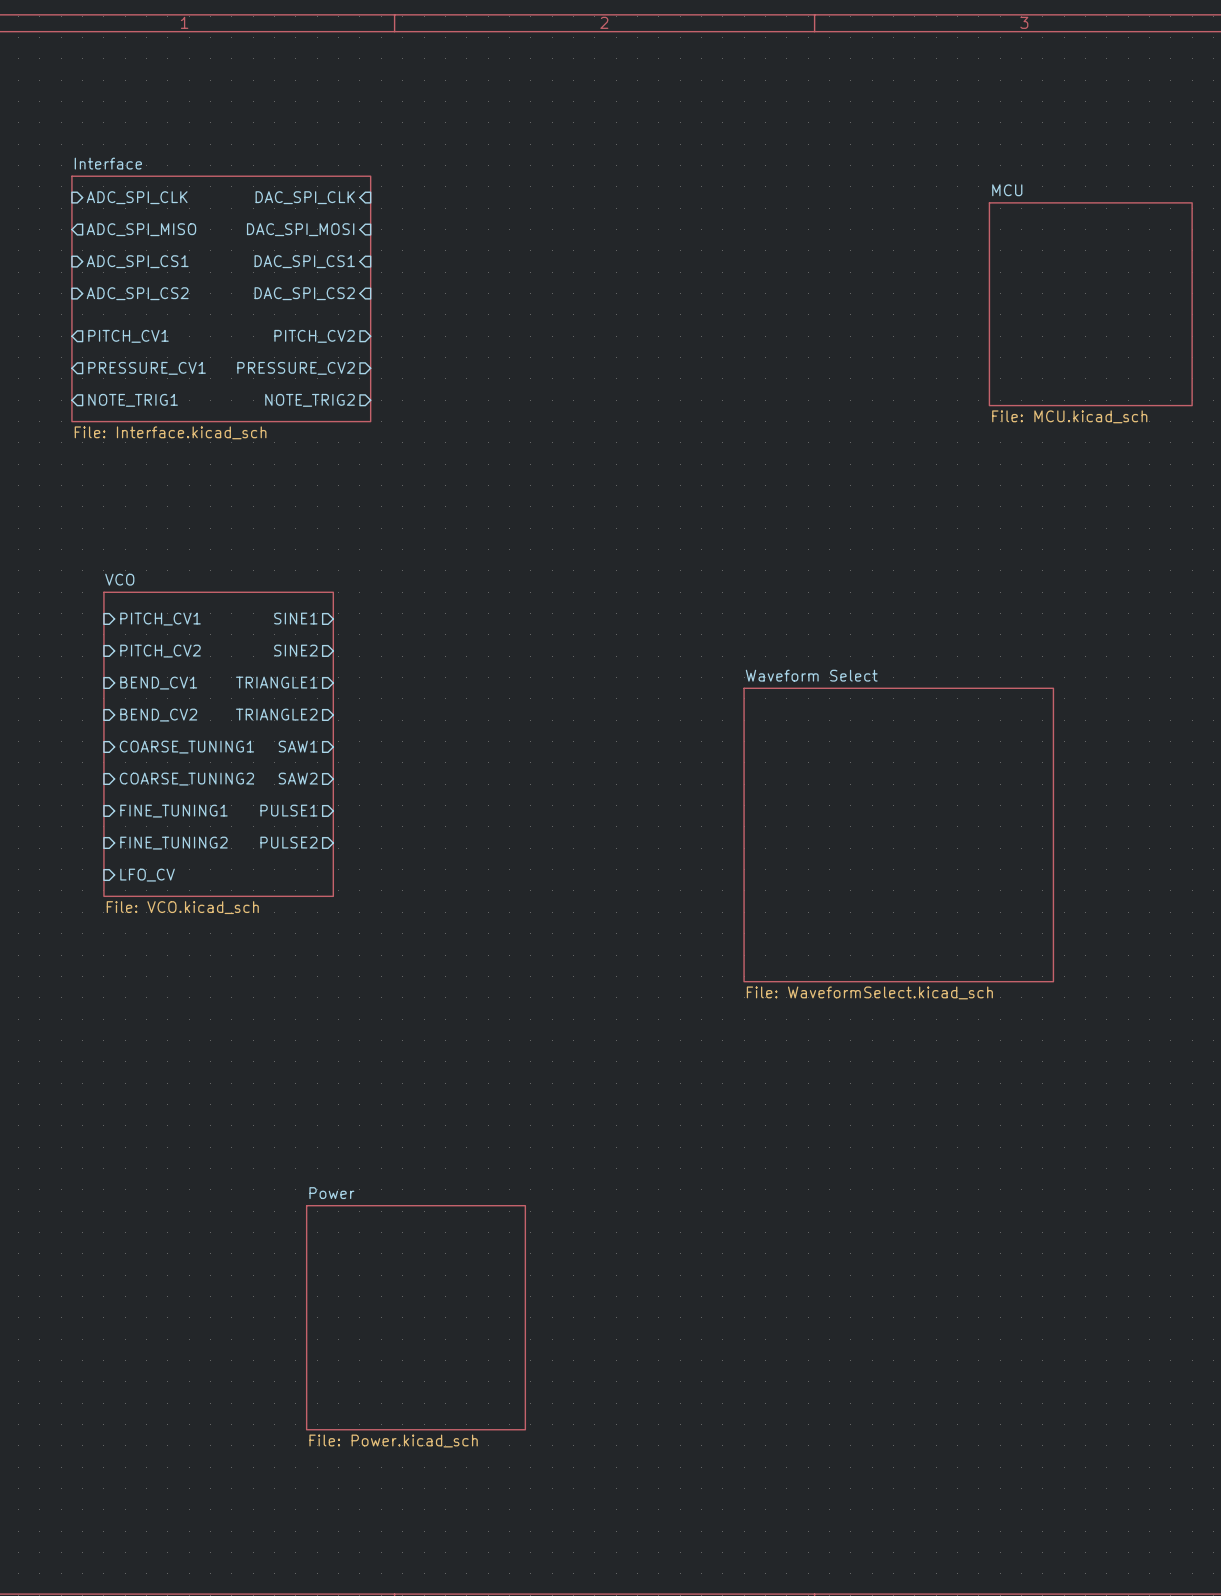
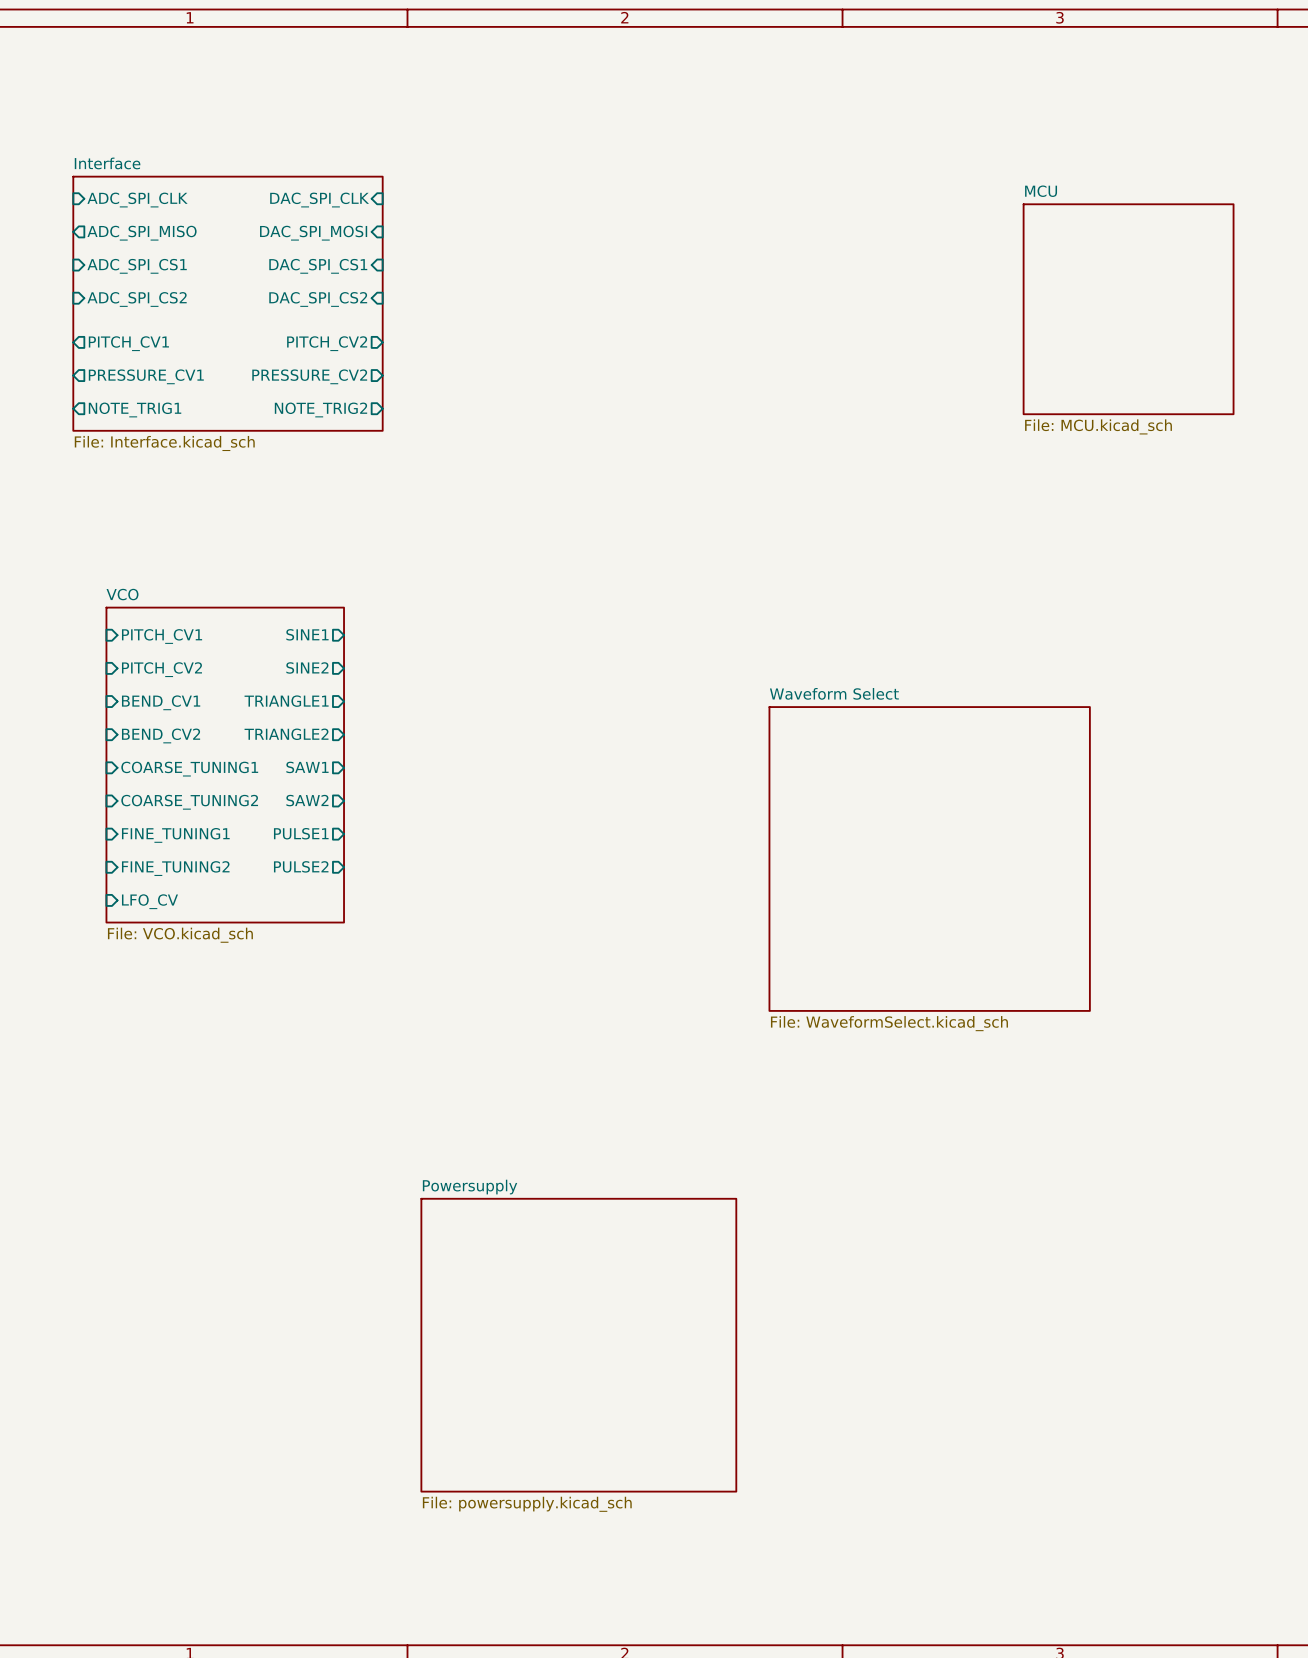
sheet Powersupply: none -> File: powersupply.kicad_sch (578, 1345)
sheet Power: File: Power.kicad_sch (416, 1317) -> none

